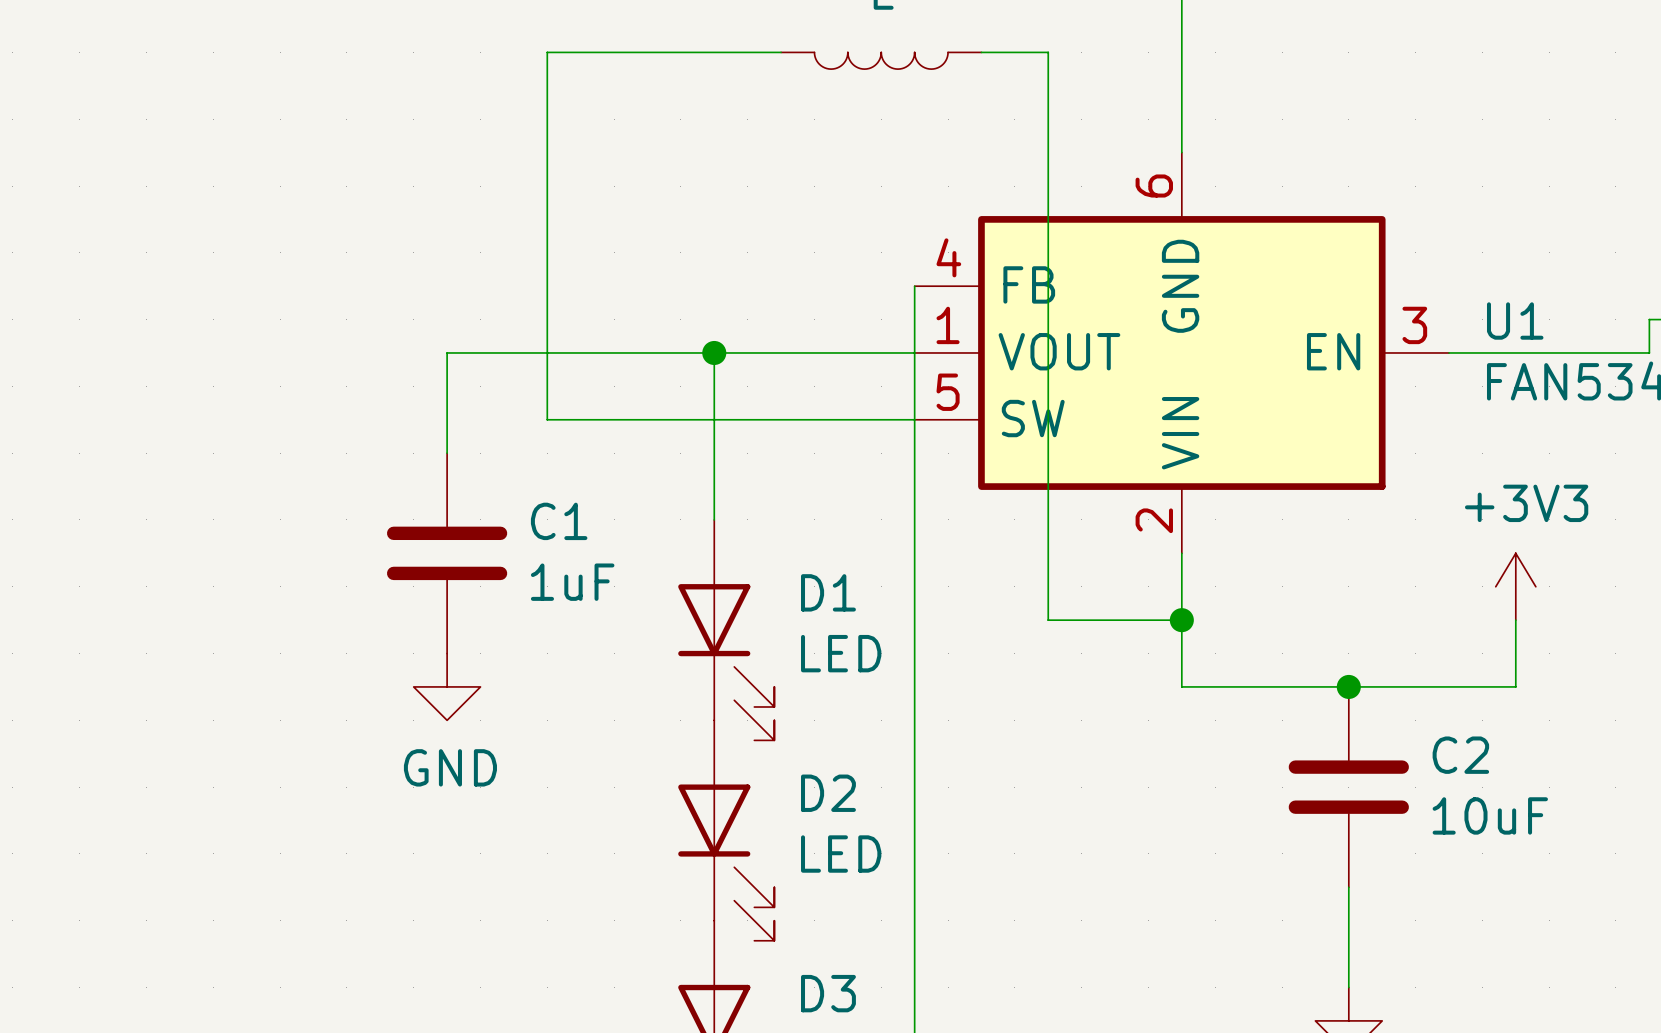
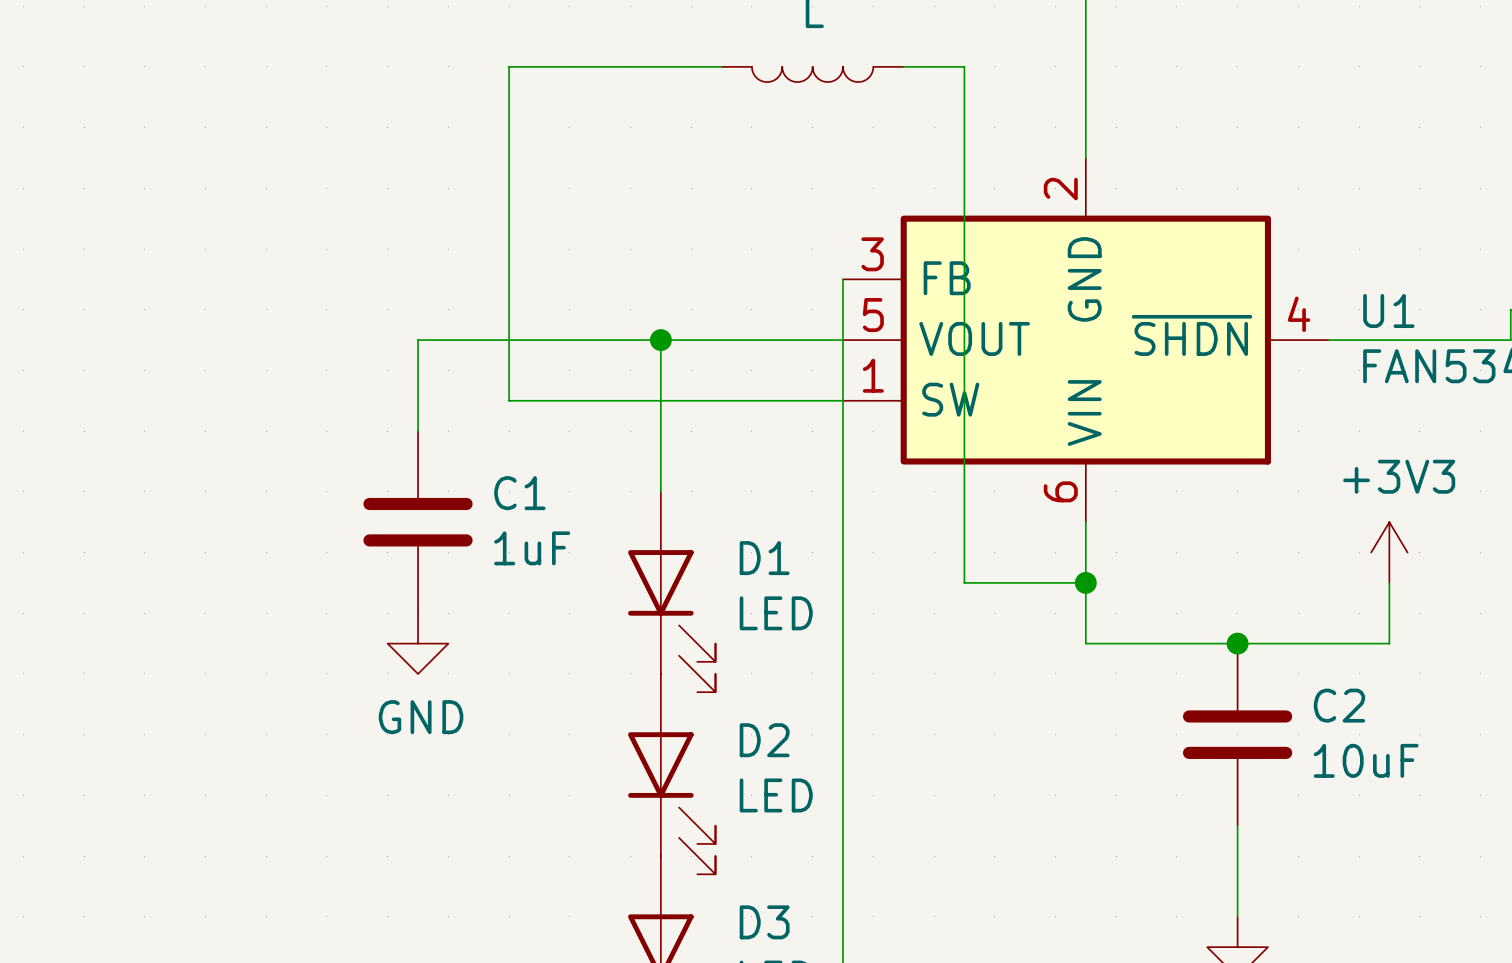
U1 pin number: 6 (1154, 186) -> 2 (1060, 189)
U1 pin number: 4 (948, 257) -> 3 (872, 254)
U1 pin number: 1 (948, 325) -> 5 (873, 315)
U1 pin number: 3 (1414, 325) -> 4 (1299, 314)
U1 pin name: EN (1333, 351) -> ~{SHDN} (1191, 335)
U1 pin number: 5 (948, 392) -> 1 (873, 375)
U1 pin number: 2 (1154, 520) -> 6 (1060, 491)

